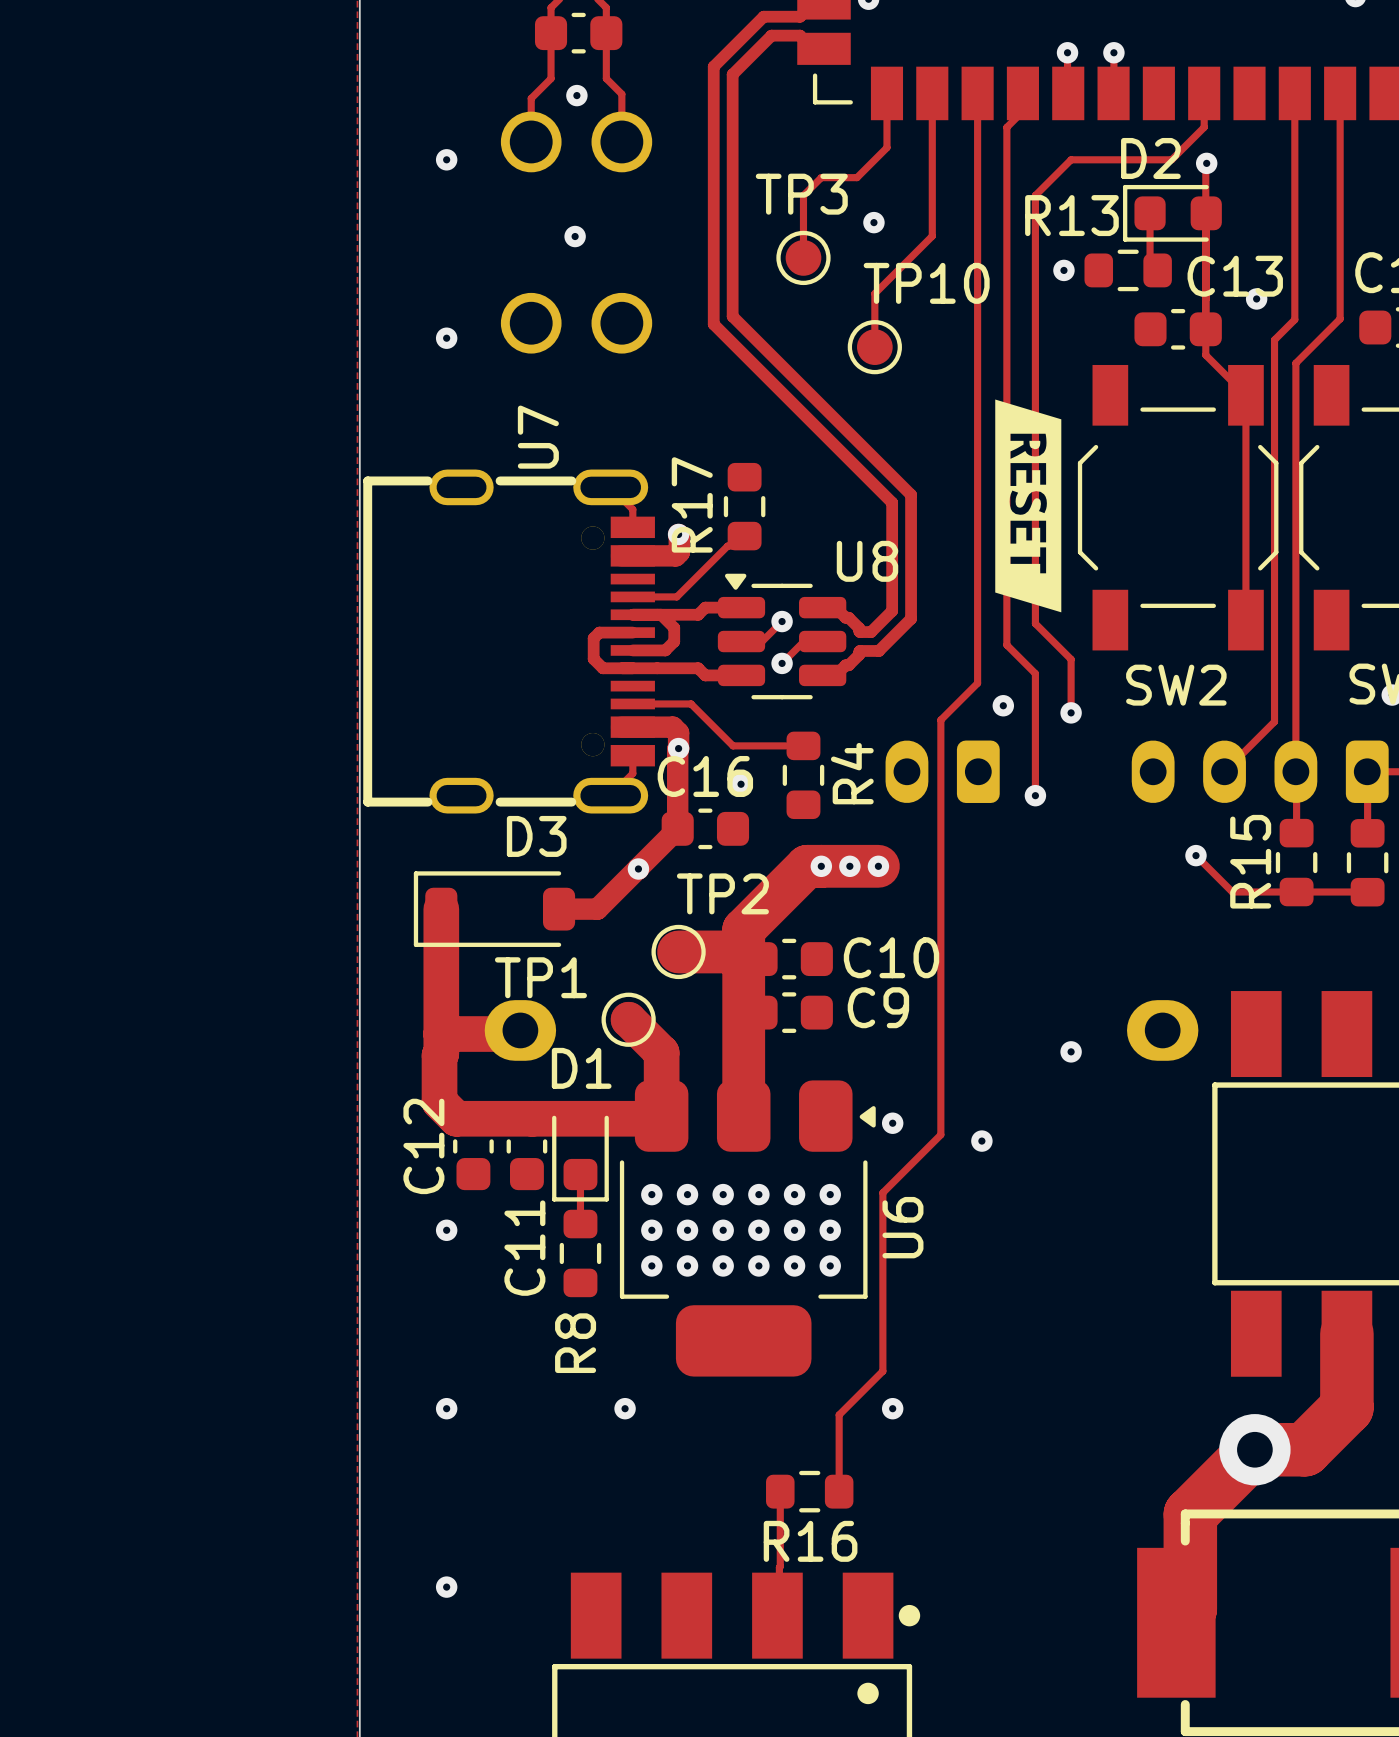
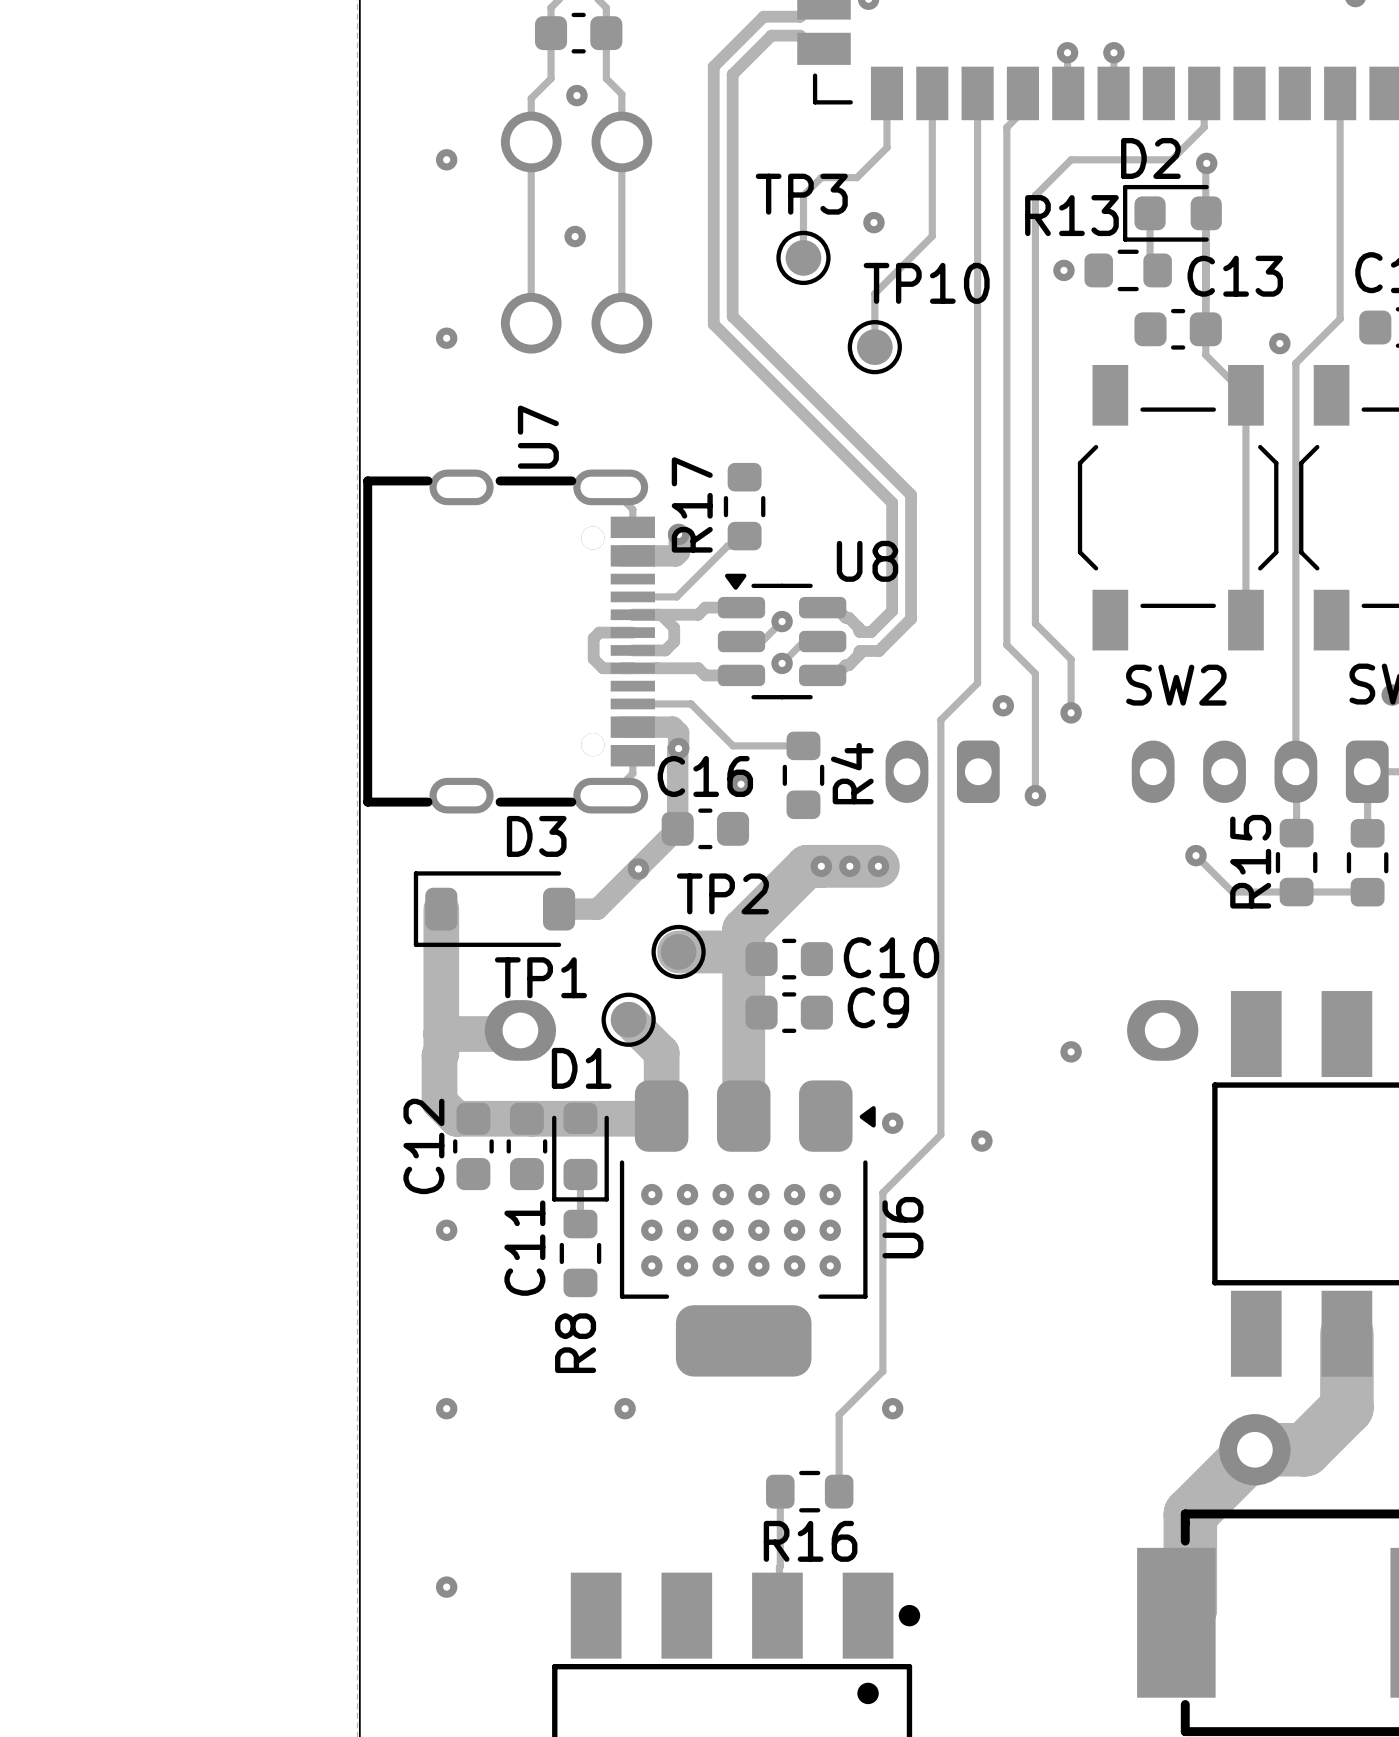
track: (1294, 93) (1294, 319) (1274, 339) (1274, 721) (1224, 771) -> none
track: none -> (531, 141) (531, 323)
track: none -> (621, 141) (621, 323)
via position: (1256, 298) -> (1279, 343)
drawing: [995, 399, 1062, 613] -> none

